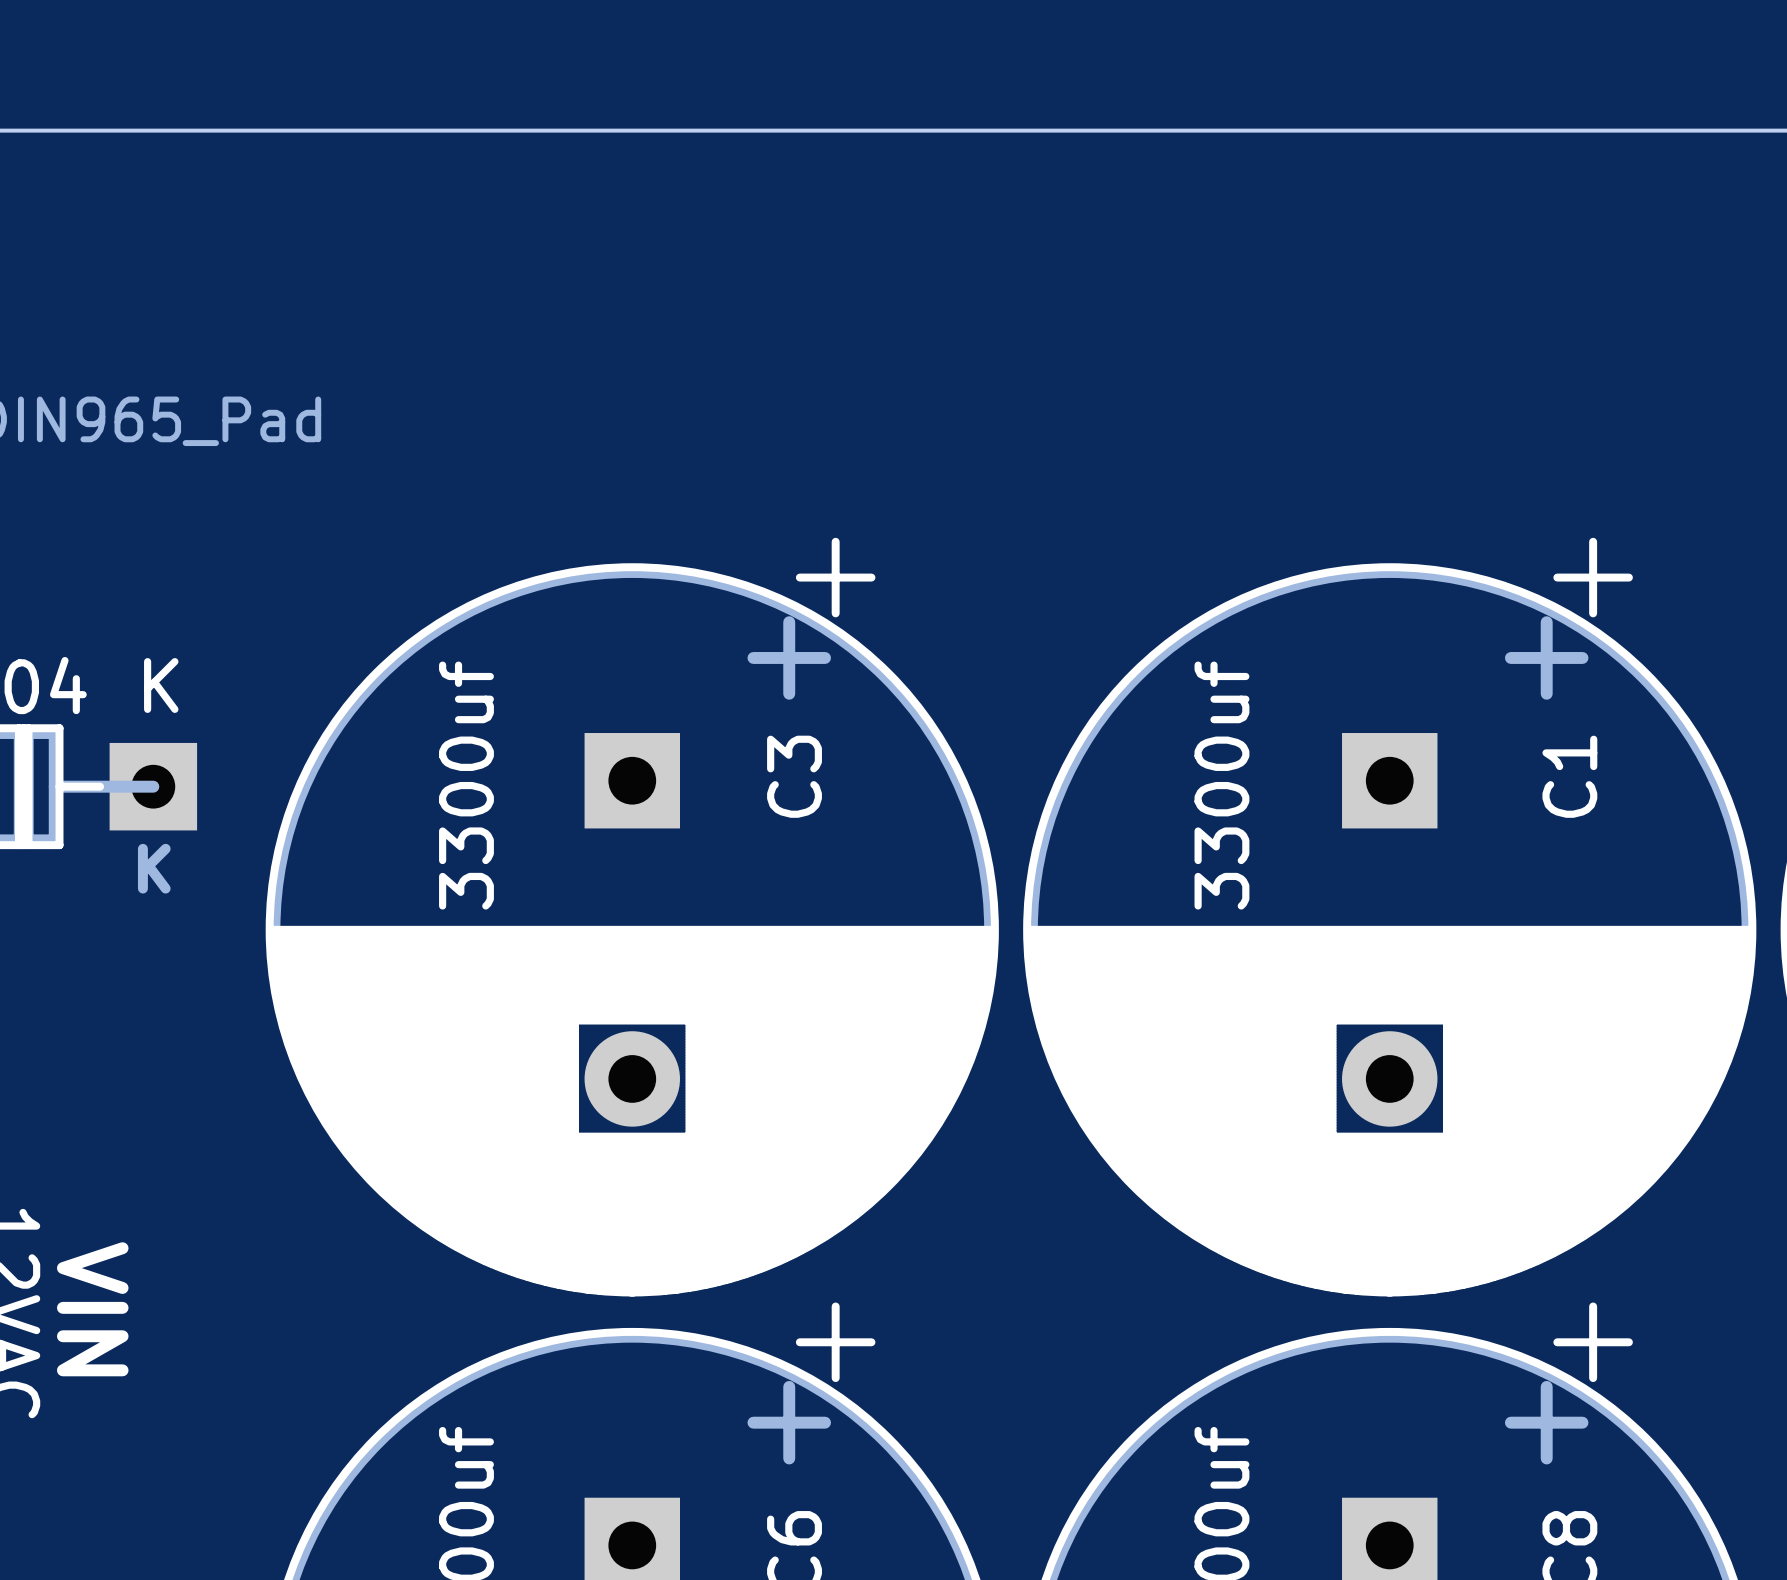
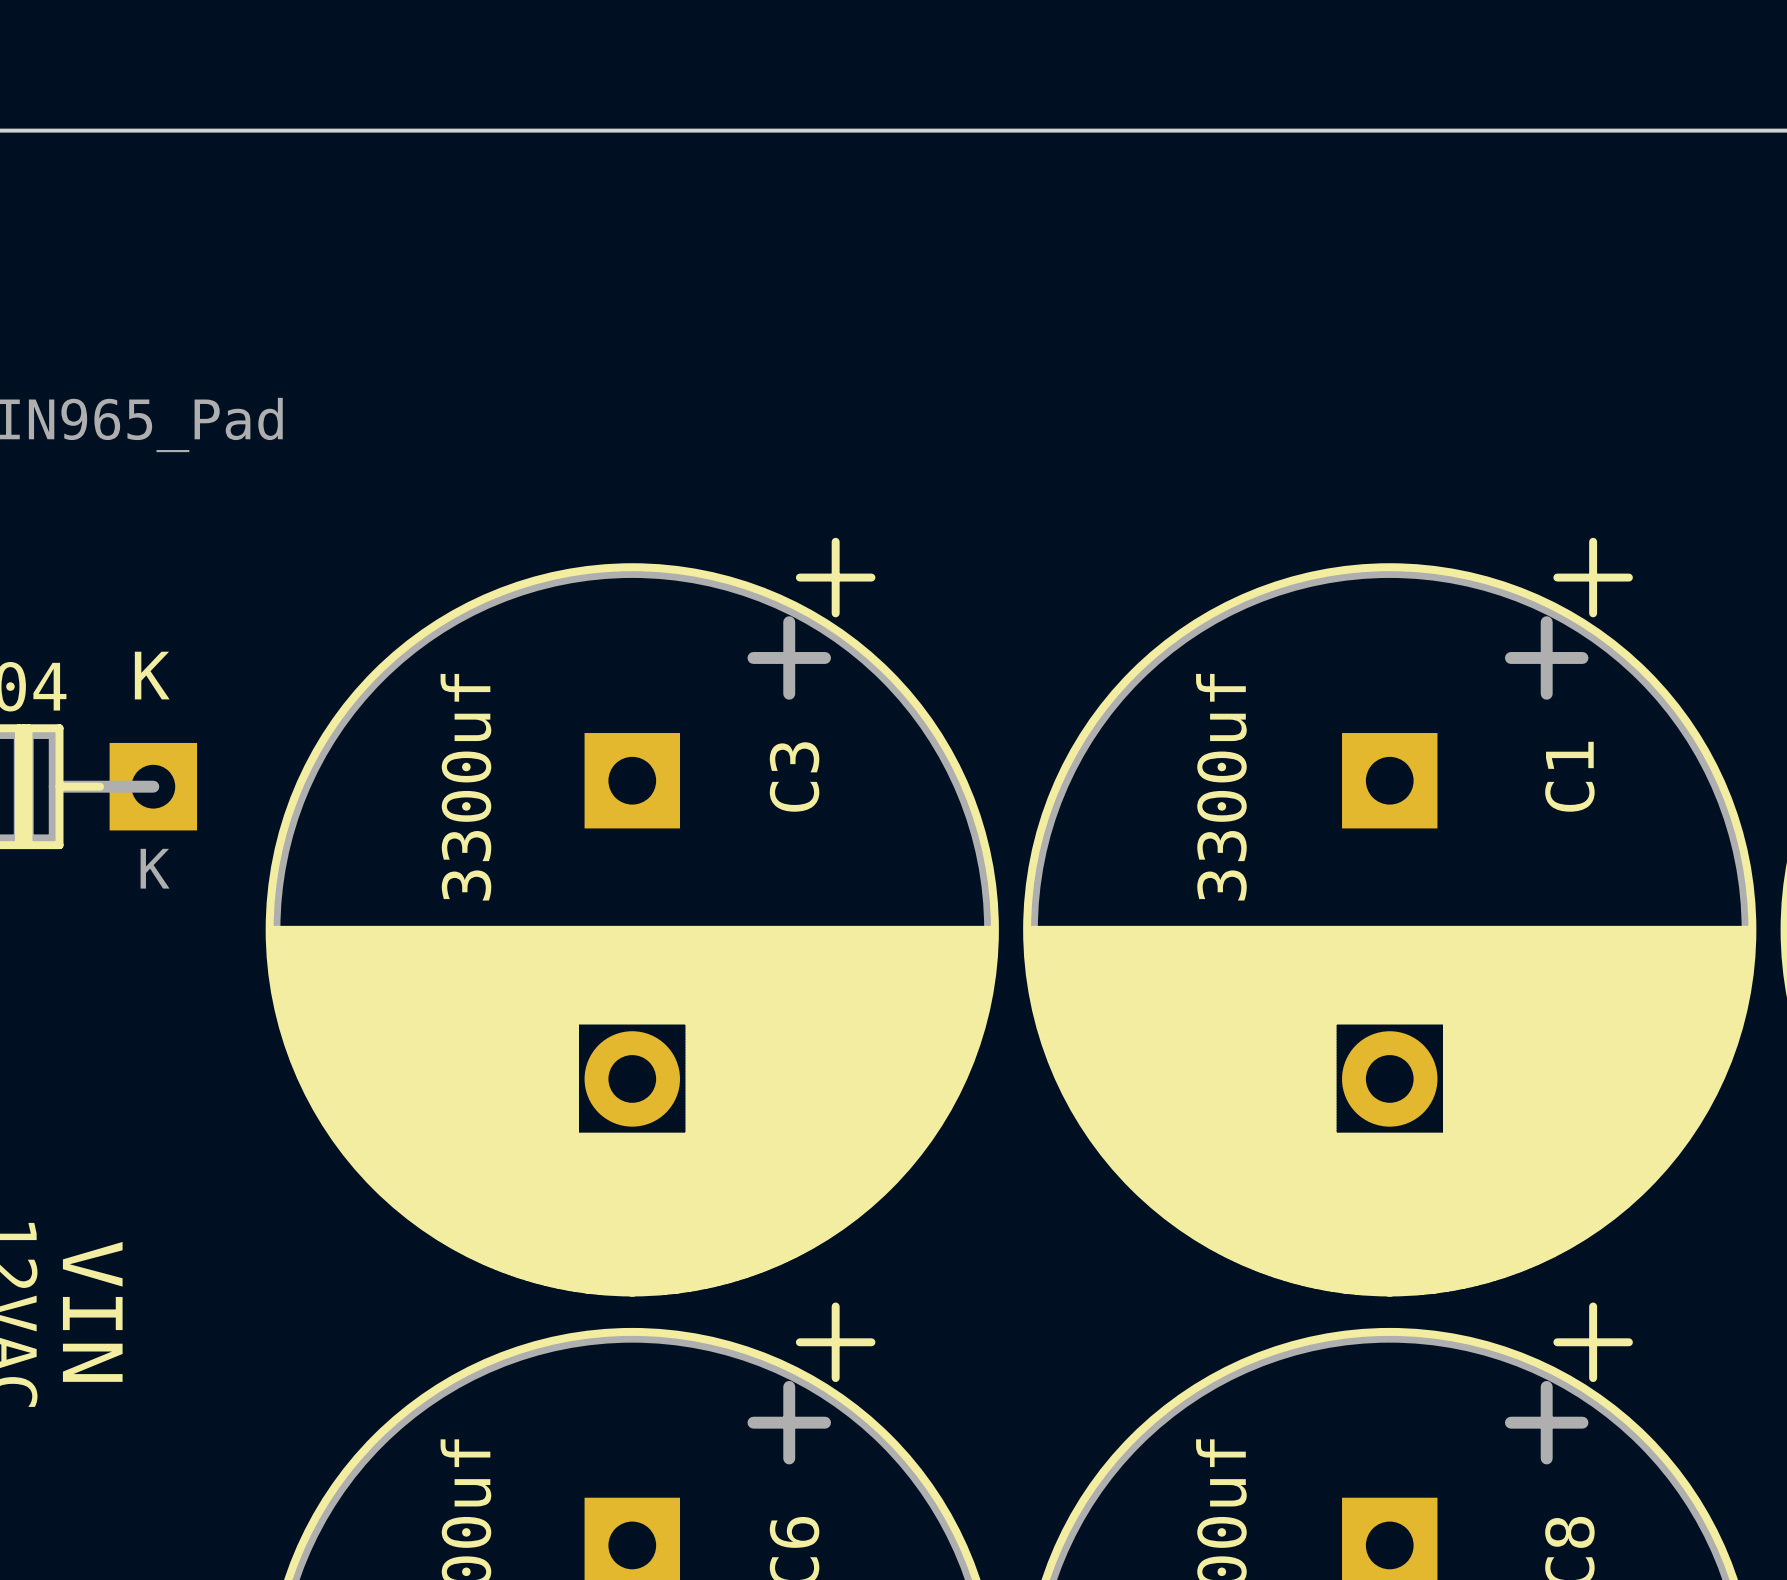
part text position: K (161, 685) -> K (152, 675)

